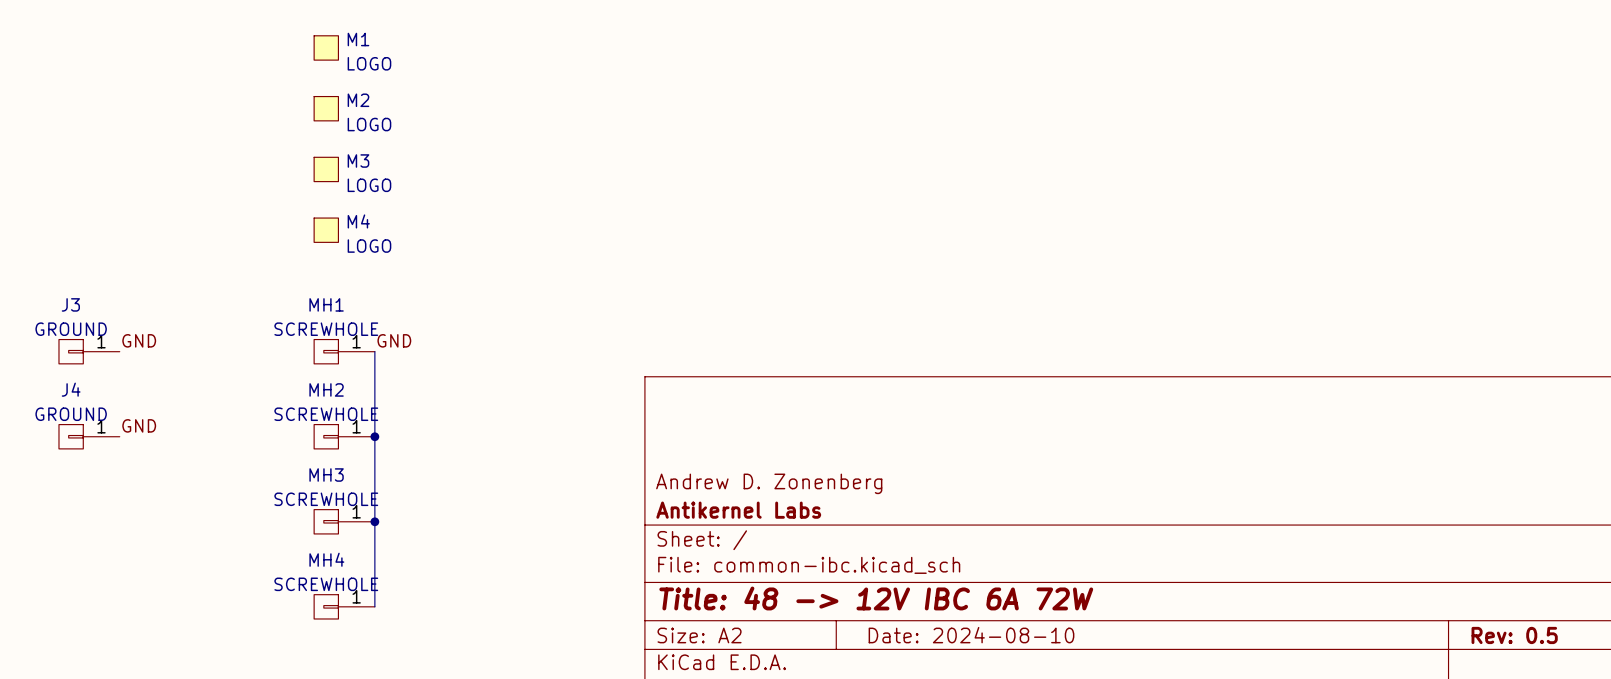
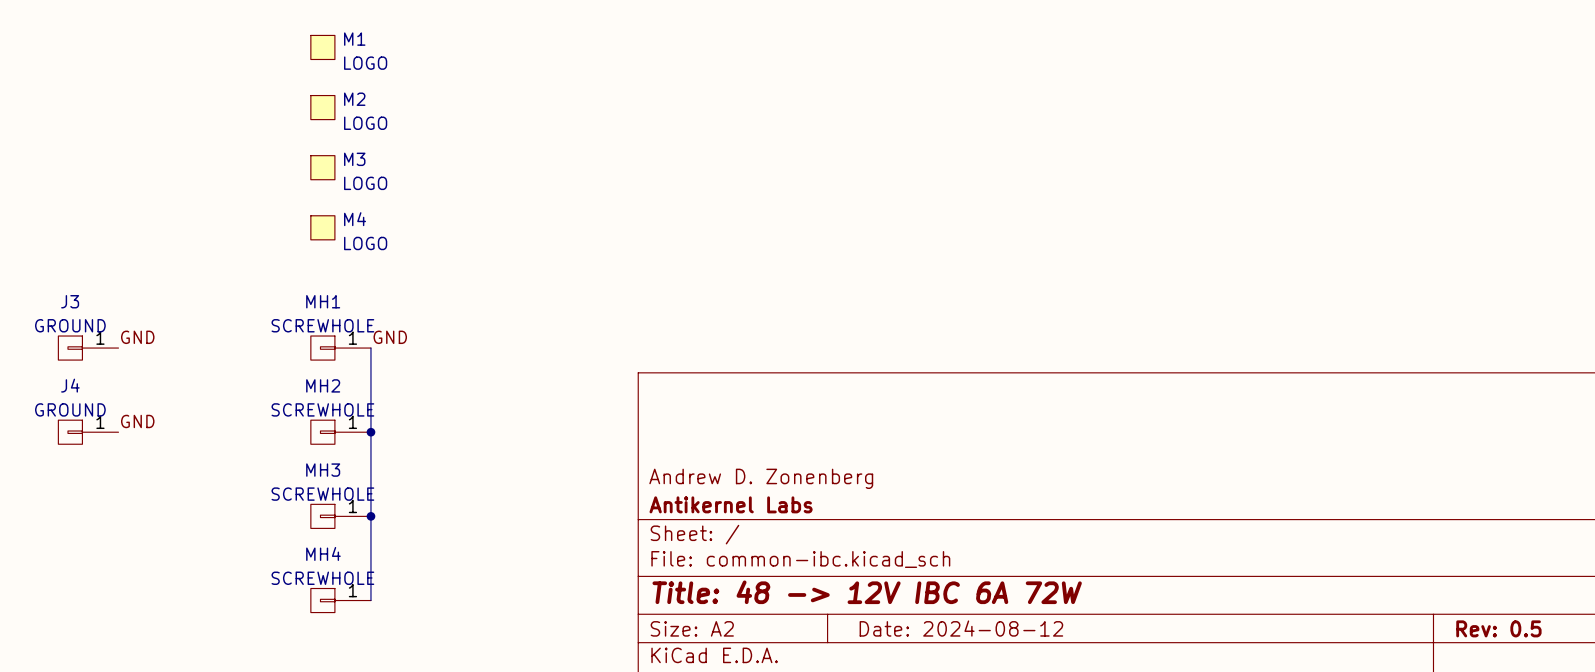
title block: Date: 2024-08-10 (971, 635) -> Date: 2024-08-12 (961, 628)

